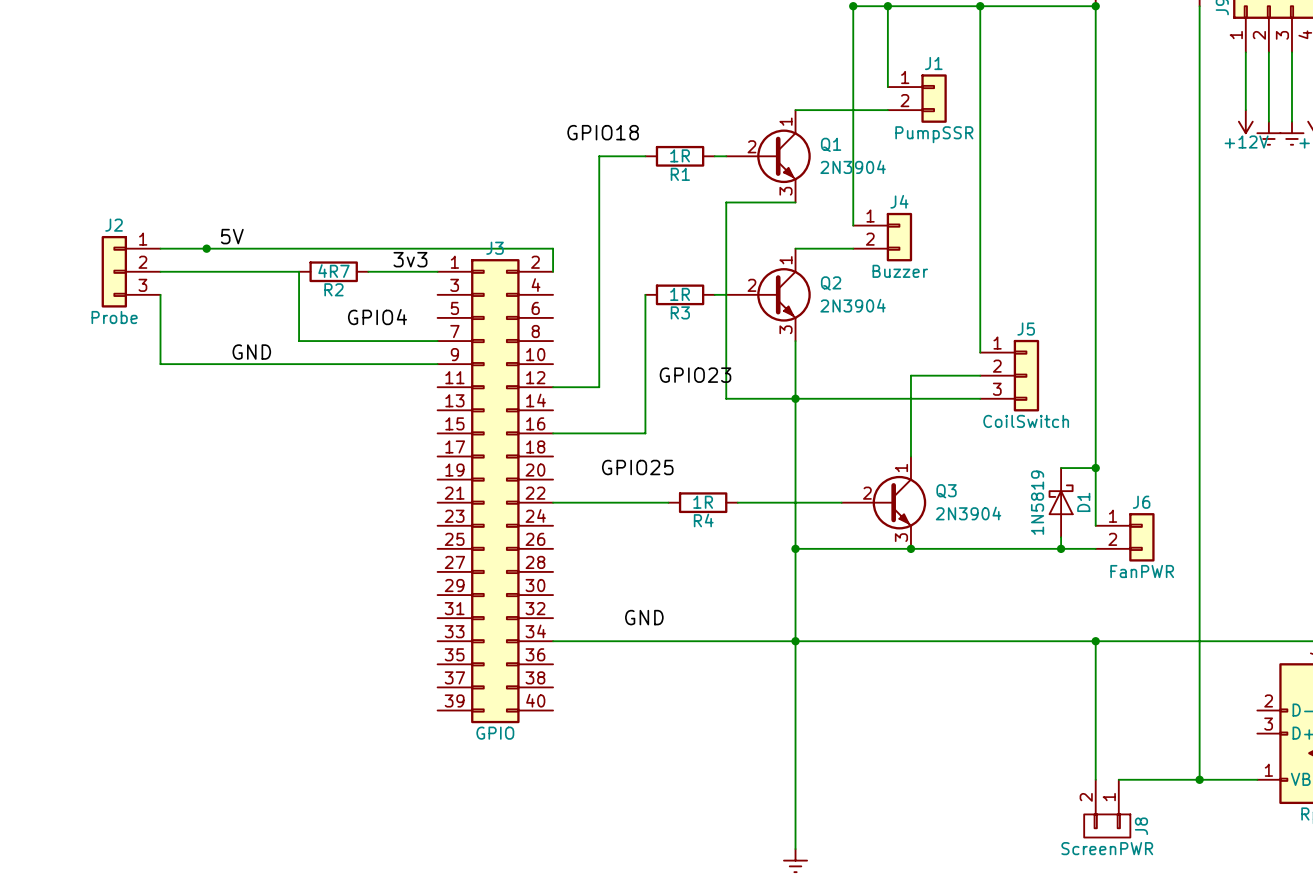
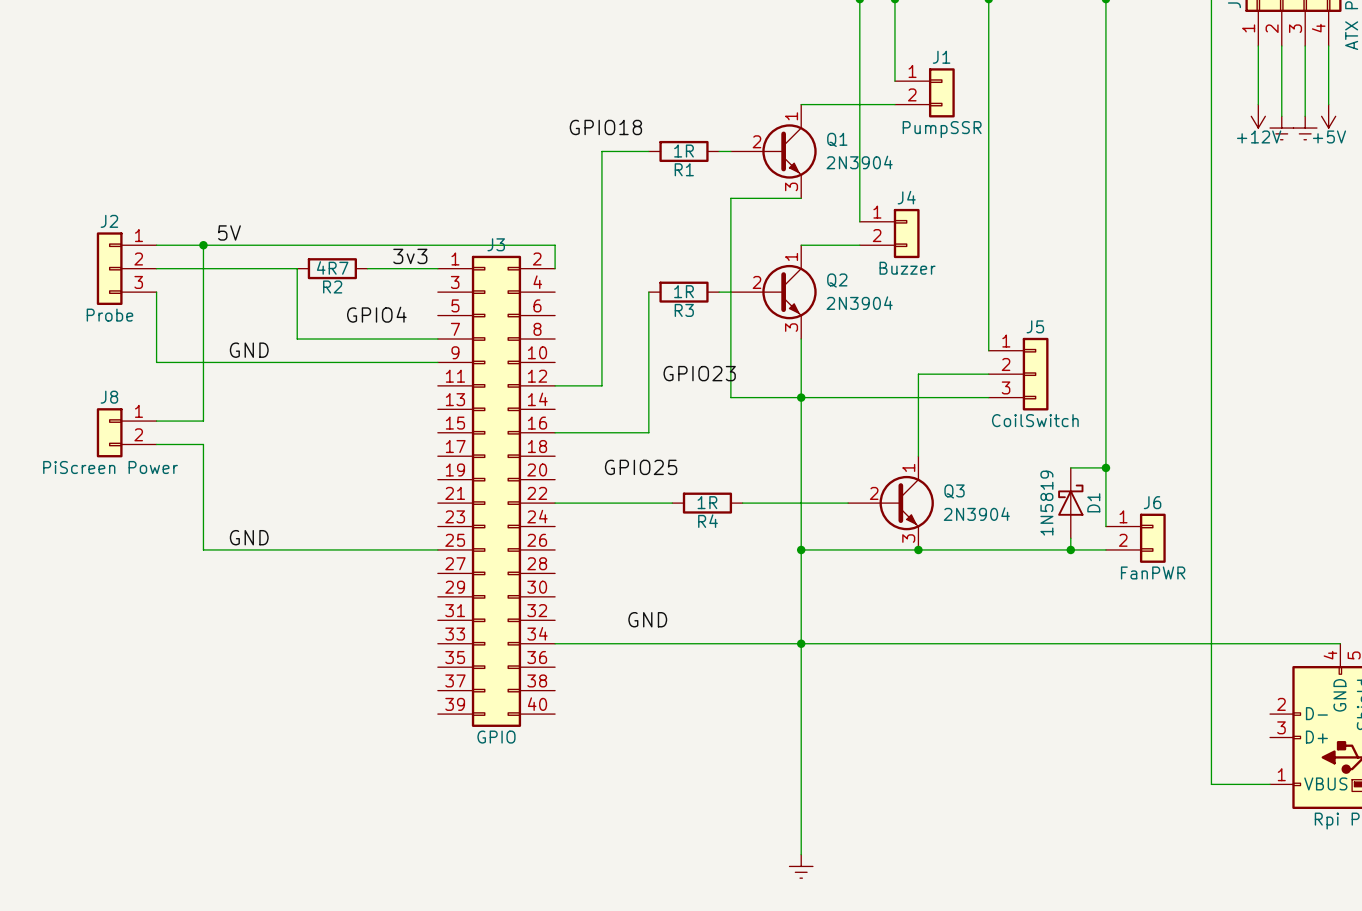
wire: none -> (203, 245) (203, 421) (156, 421)
wire: none -> (156, 444) (203, 444) (203, 549) (437, 549)
label: none -> GND (249, 537)
wire: (1095, 641) (1095, 779) -> none
junction: (1095, 641) -> none
J8 symbol: [1084, 779, 1131, 838] -> [96, 408, 157, 458]
wire: (1118, 779) (1199, 779) -> none
junction: (1199, 779) -> none
J8 name position: J8 (1141, 826) -> J8 (109, 397)
J8 value: ScreenPWR (1107, 848) -> PiScreen Power (110, 467)

